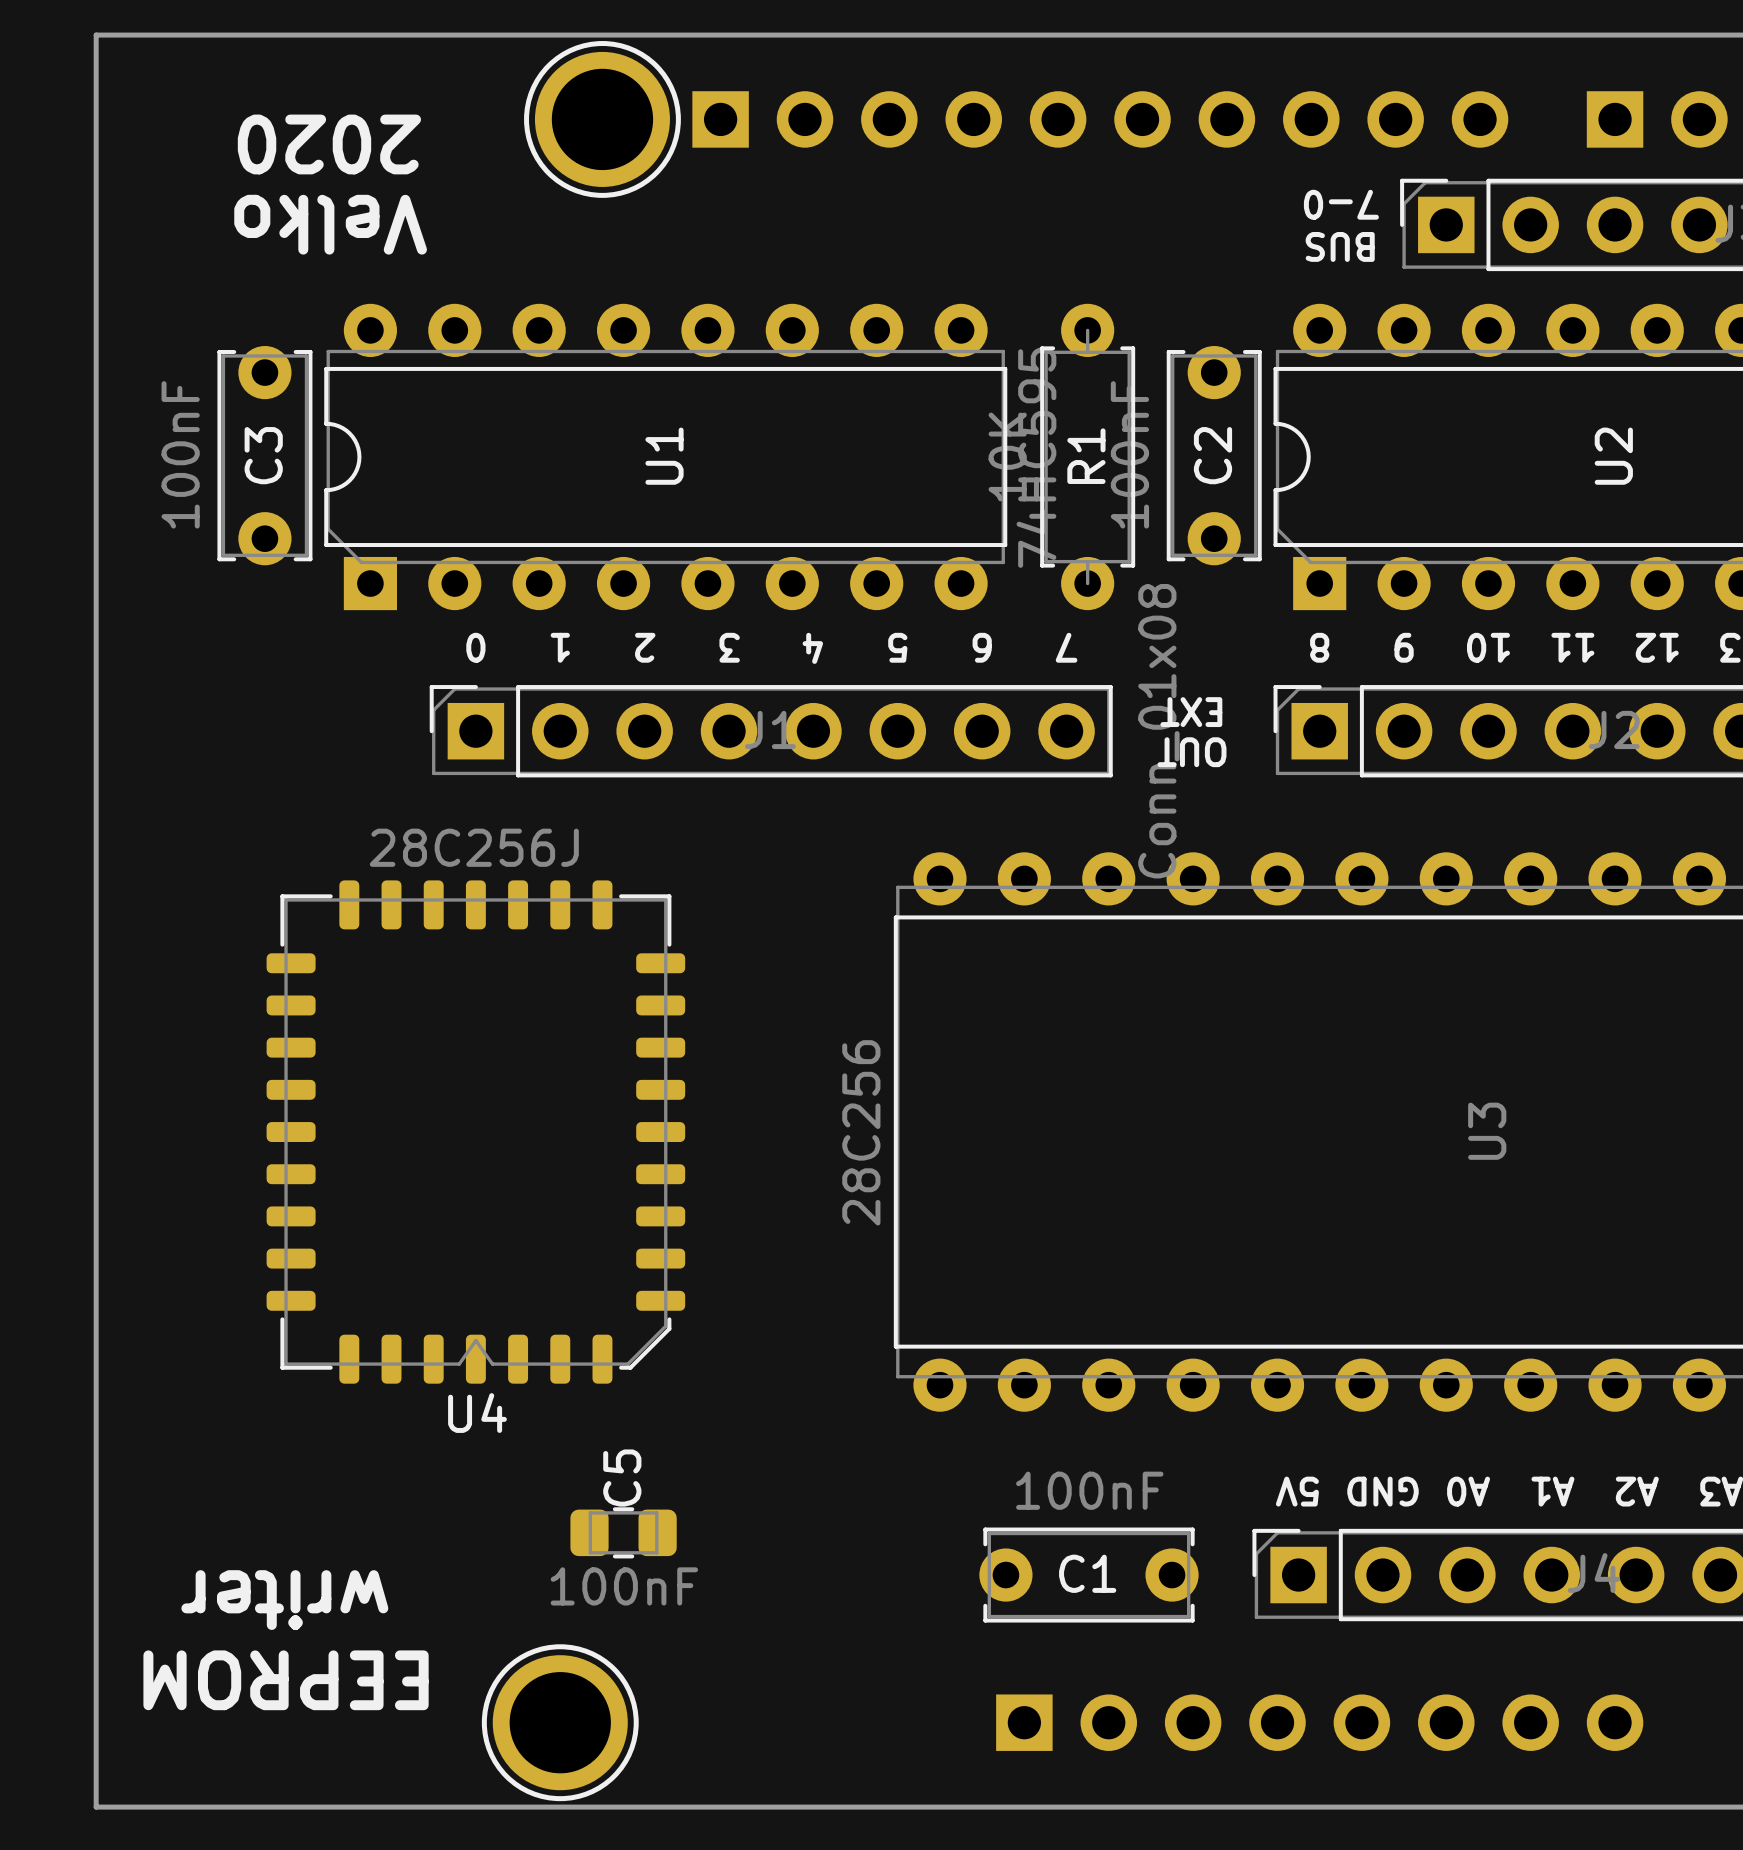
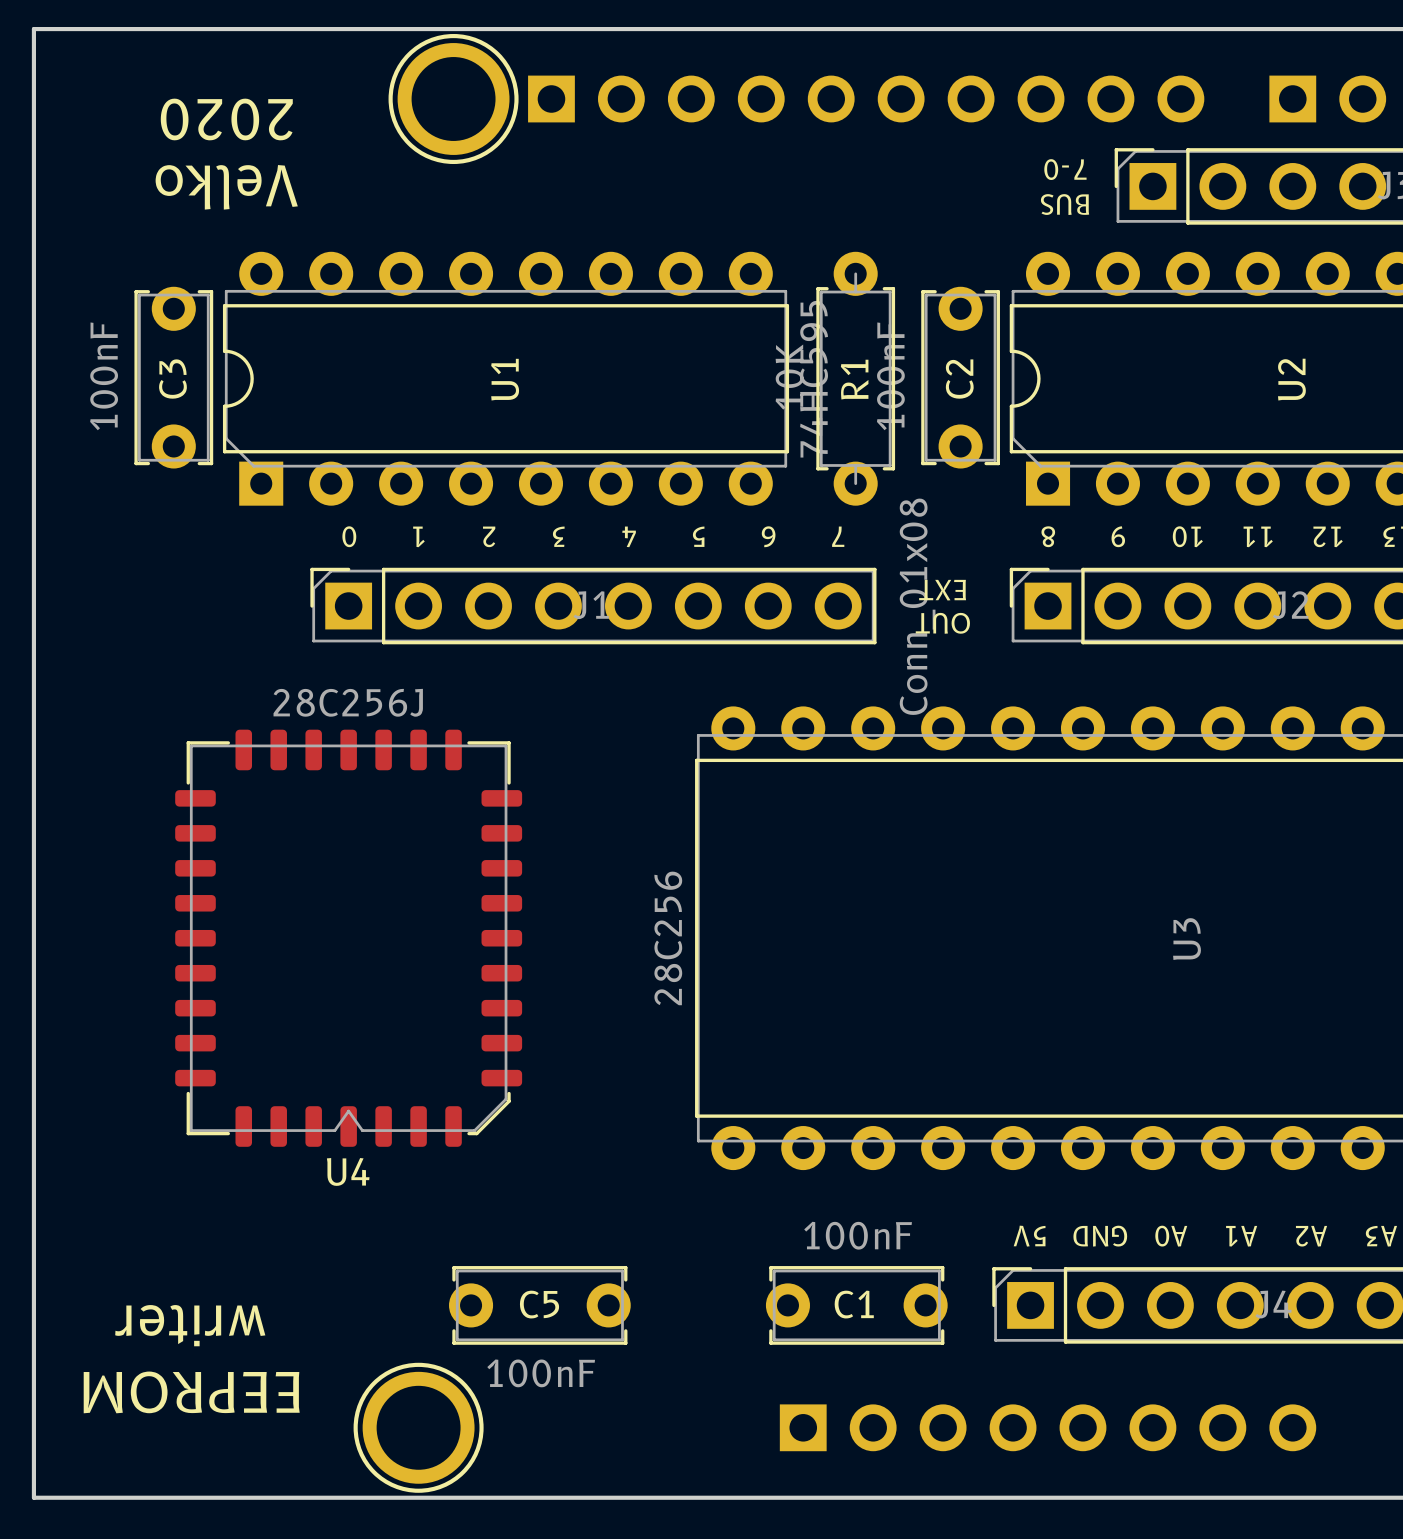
C5 footprint: [570, 1507, 677, 1559] -> [449, 1266, 631, 1345]

